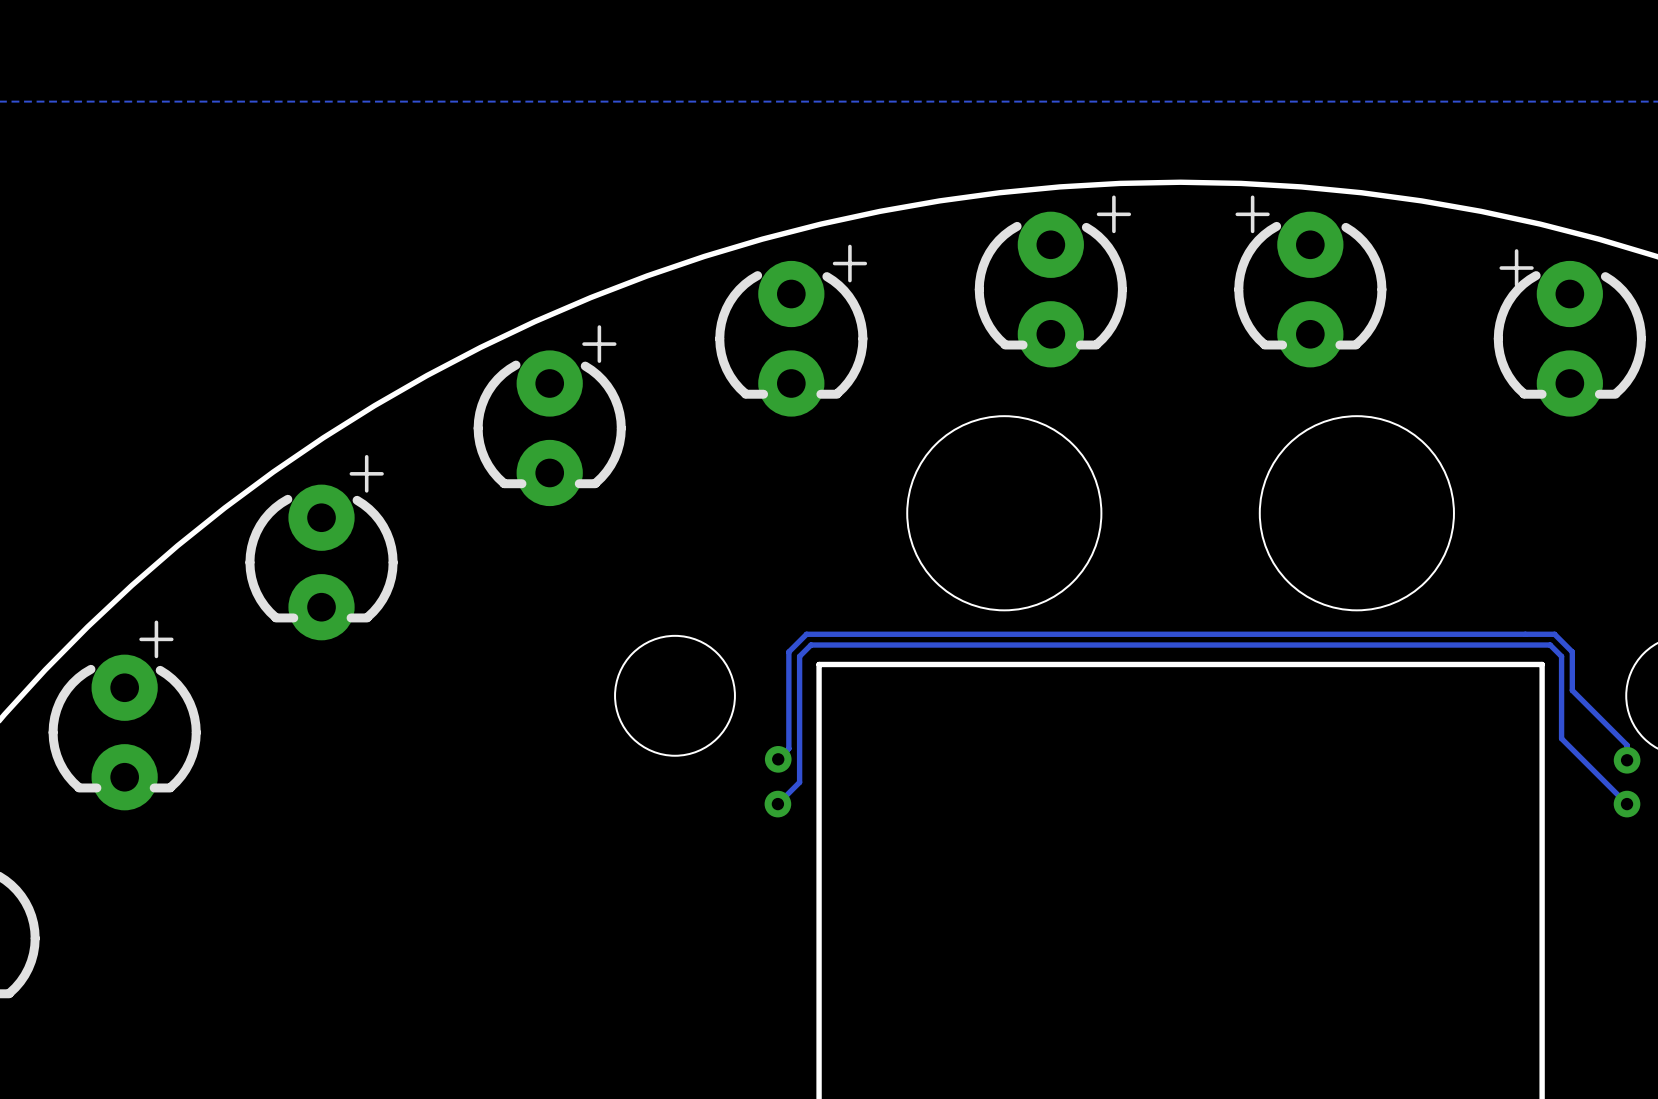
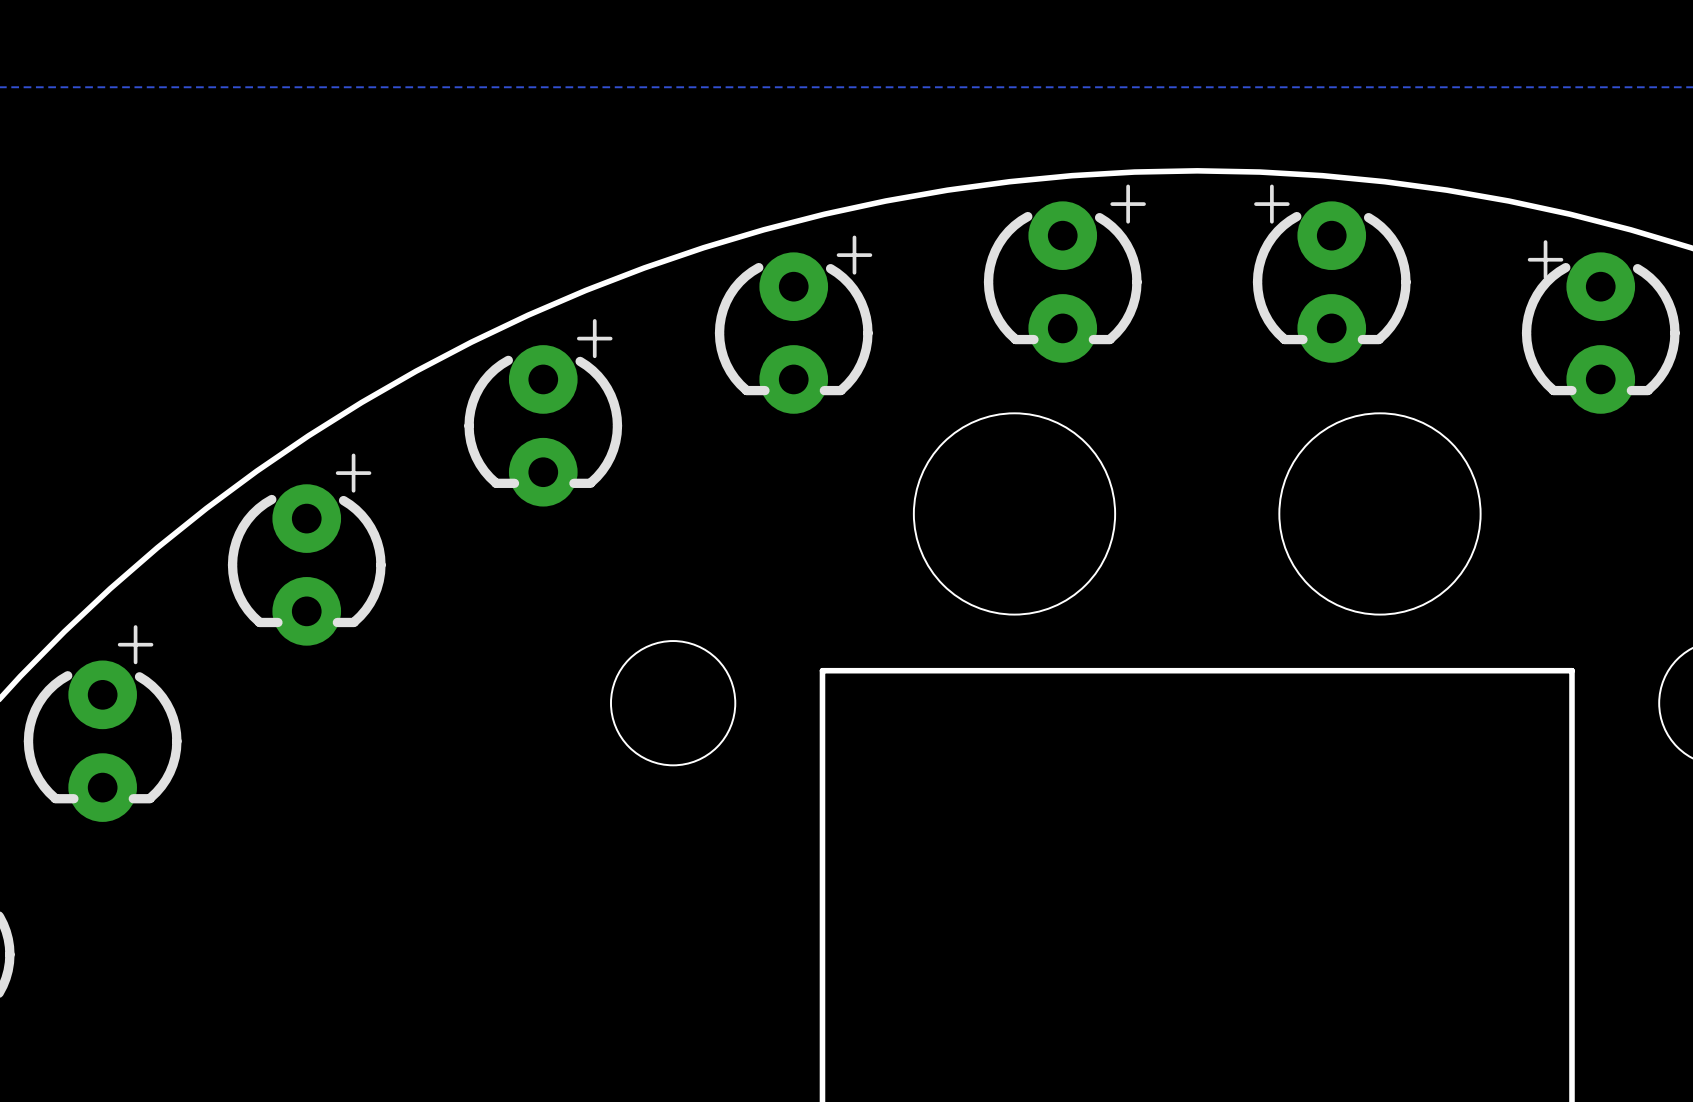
track: (778, 759) (788, 748) (788, 651) (806, 634) (1554, 634) (1572, 651) (1572, 690) (1627, 745) (1627, 760) -> none
via: (778, 759) -> none
via: (1627, 760) -> none
via: (777, 804) -> none
track: (1627, 804) (1561, 738) (1561, 656) (1550, 645) (811, 645) (799, 656) (799, 782) (777, 804) -> none
via: (1627, 804) -> none

